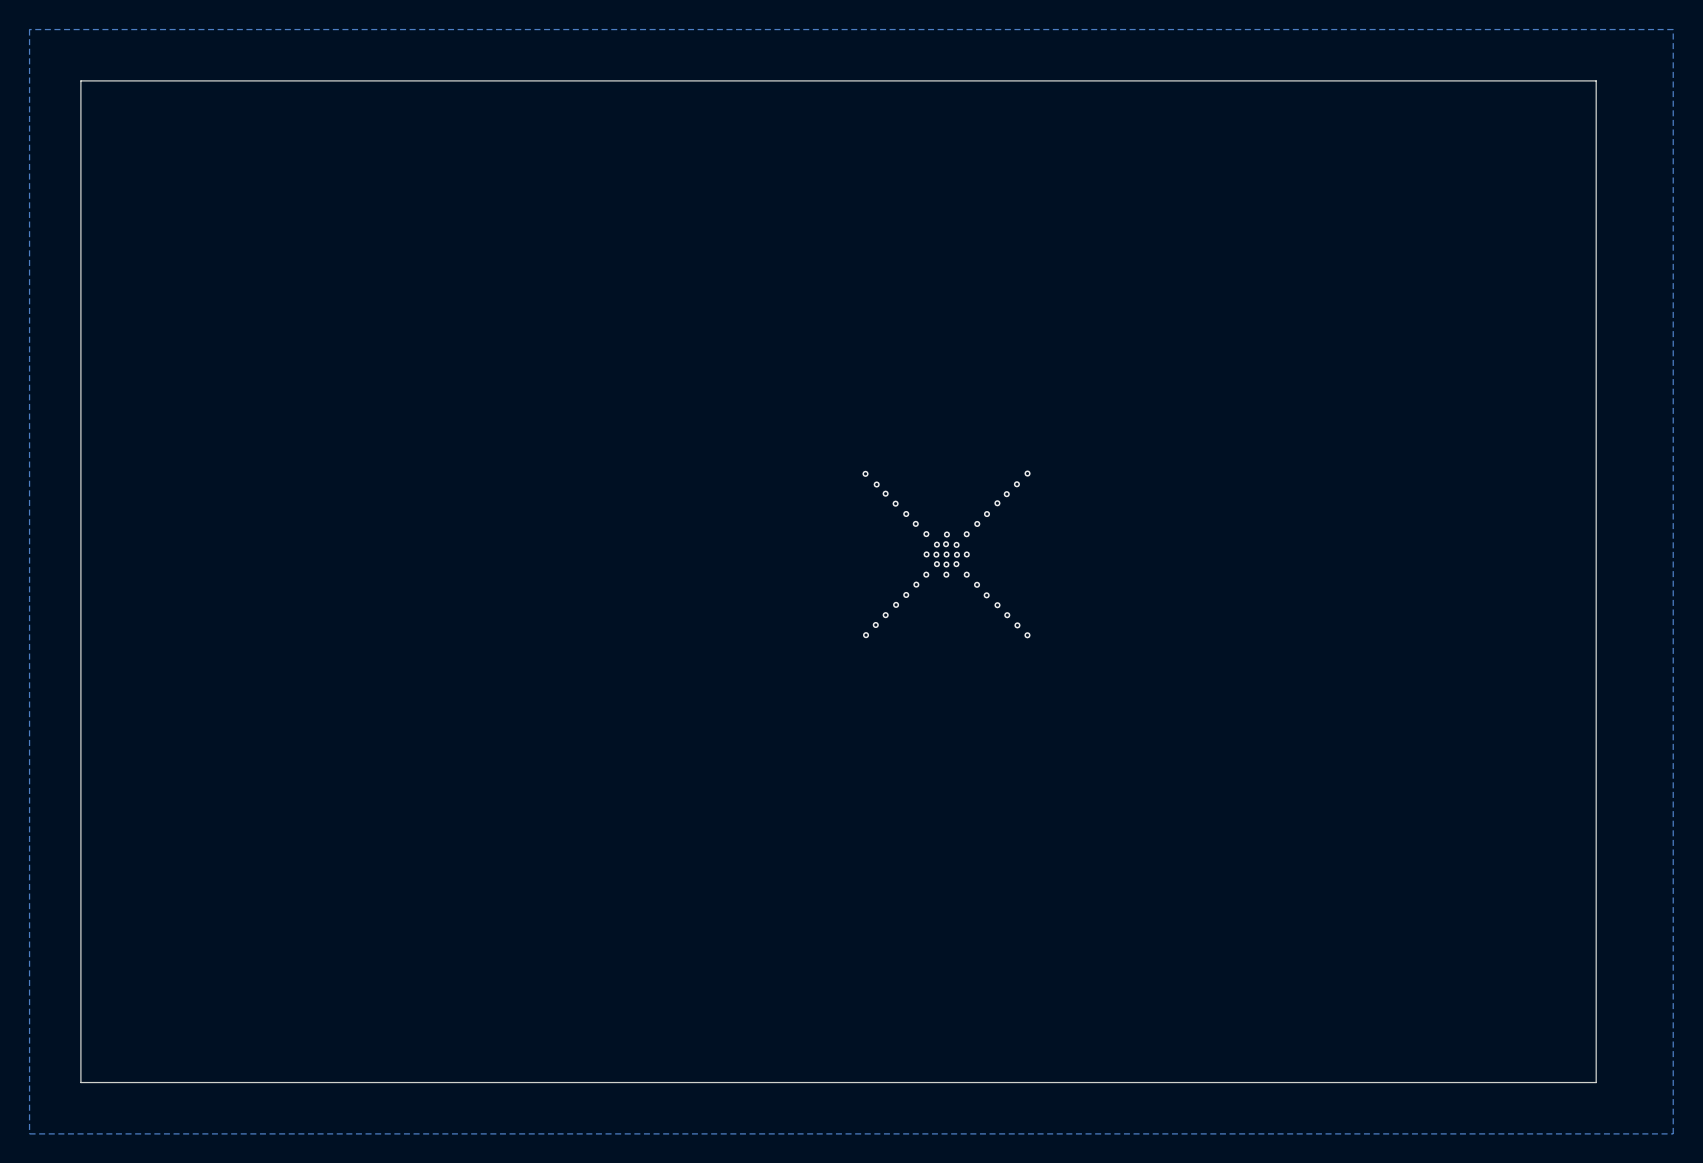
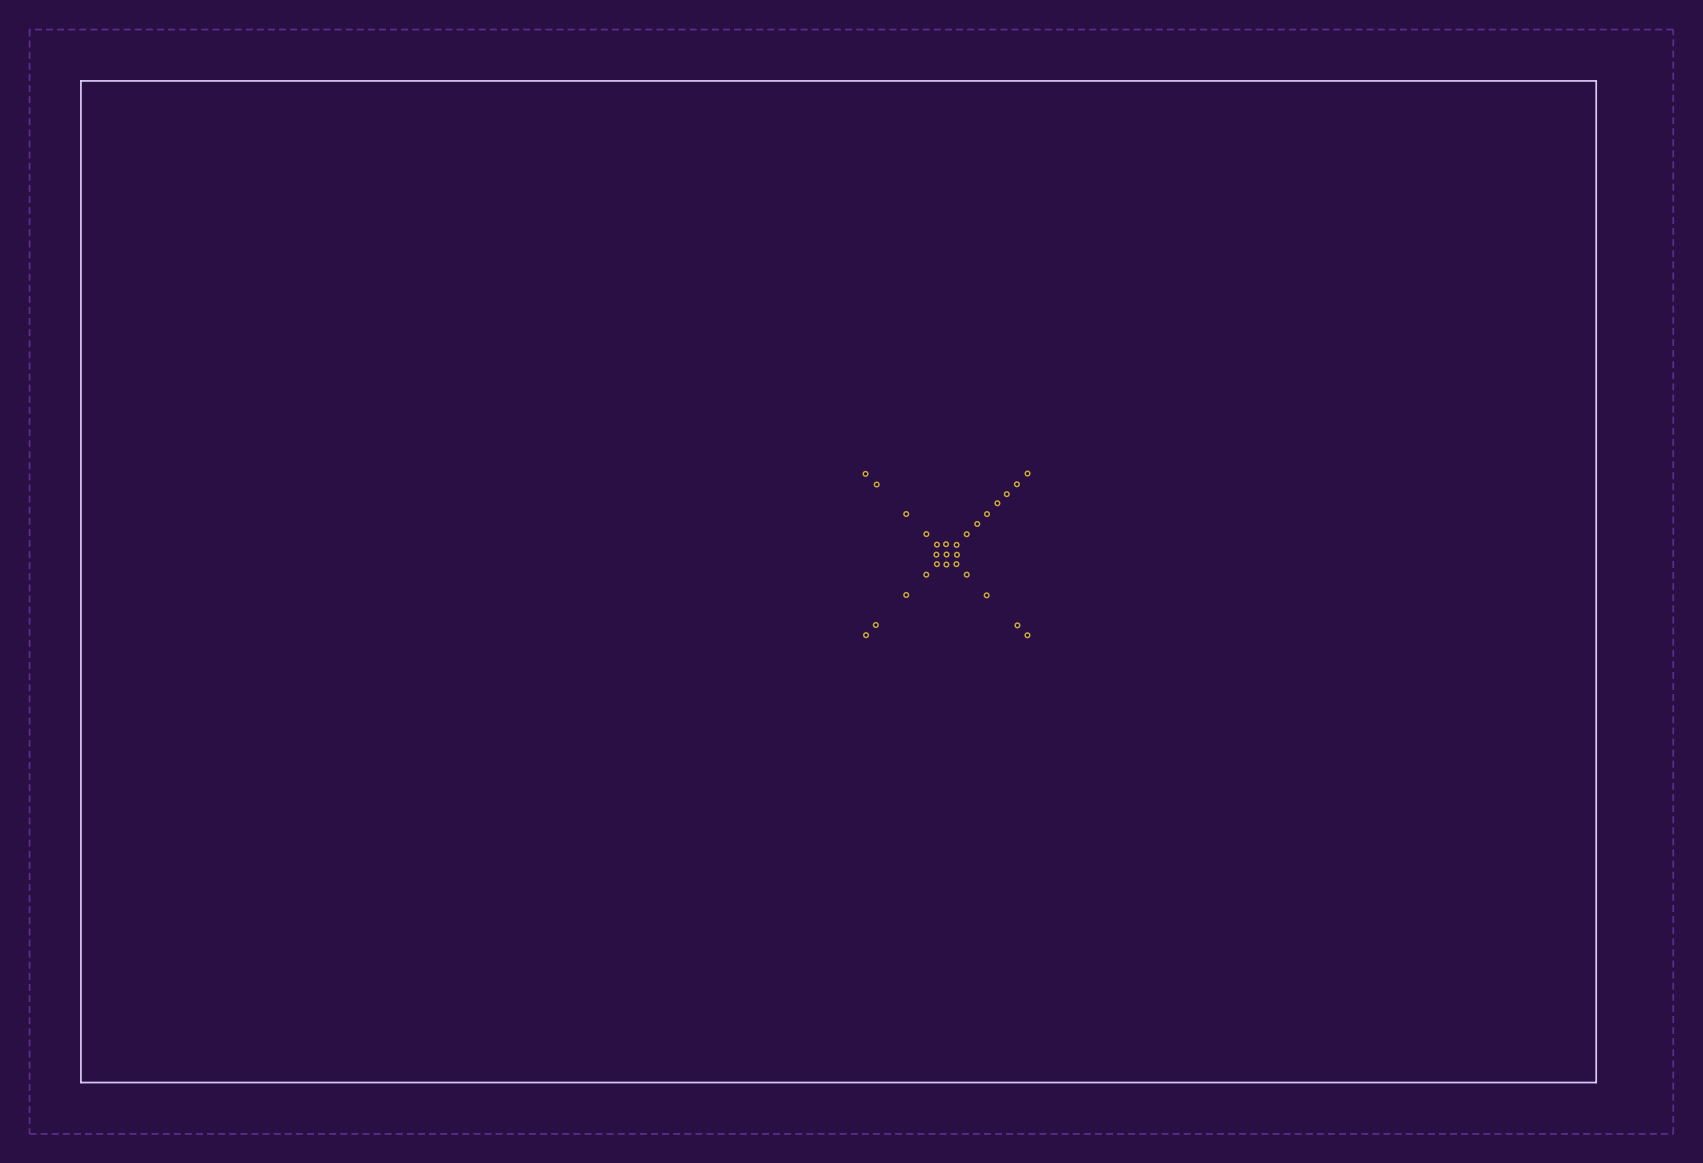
via: (885, 493) -> none
via: (895, 503) -> none
via: (915, 523) -> none
via: (946, 534) -> none
via: (926, 554) -> none
via: (966, 554) -> none
via: (946, 574) -> none
via: (916, 584) -> none
via: (977, 584) -> none
via: (896, 604) -> none
via: (997, 605) -> none
via: (885, 615) -> none
via: (1007, 615) -> none

